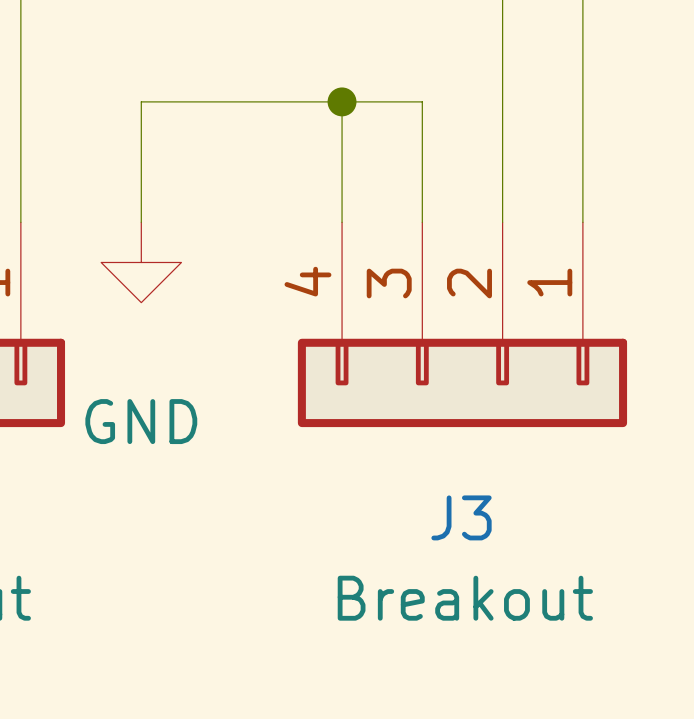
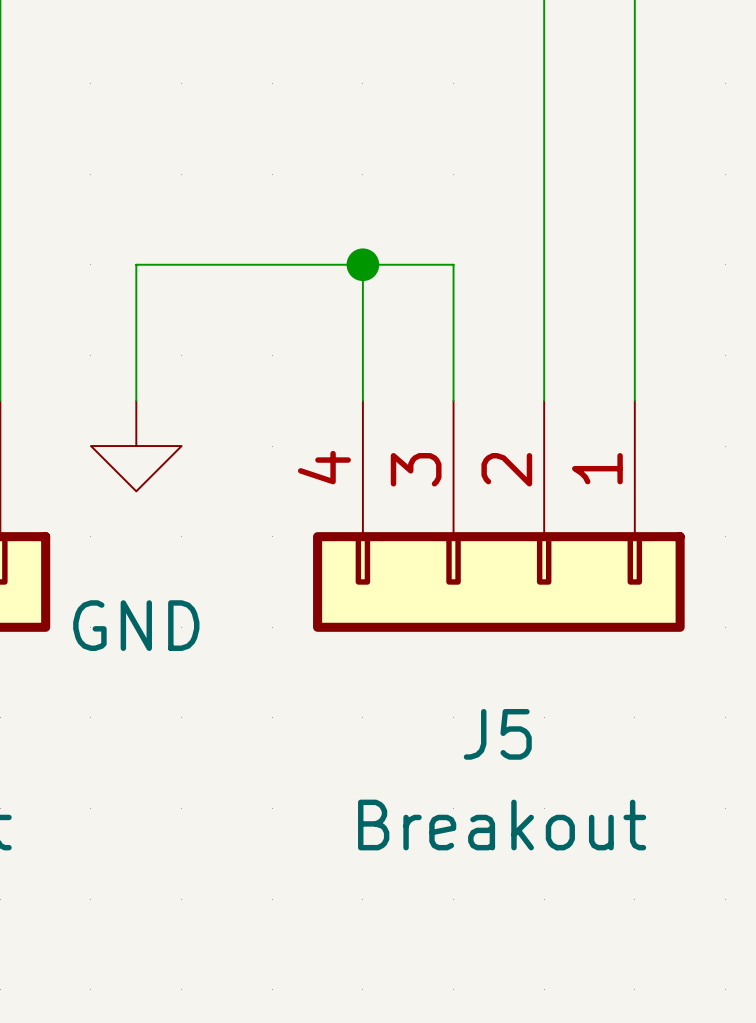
J3 name: J3 (461, 517) -> J5 (497, 734)

